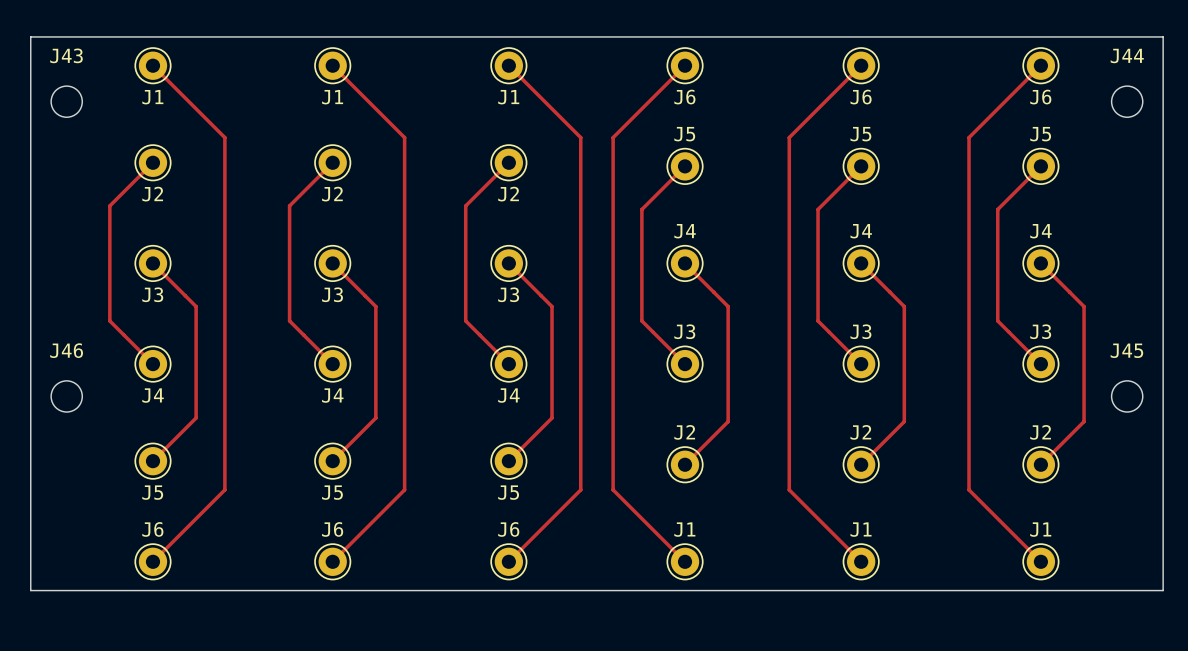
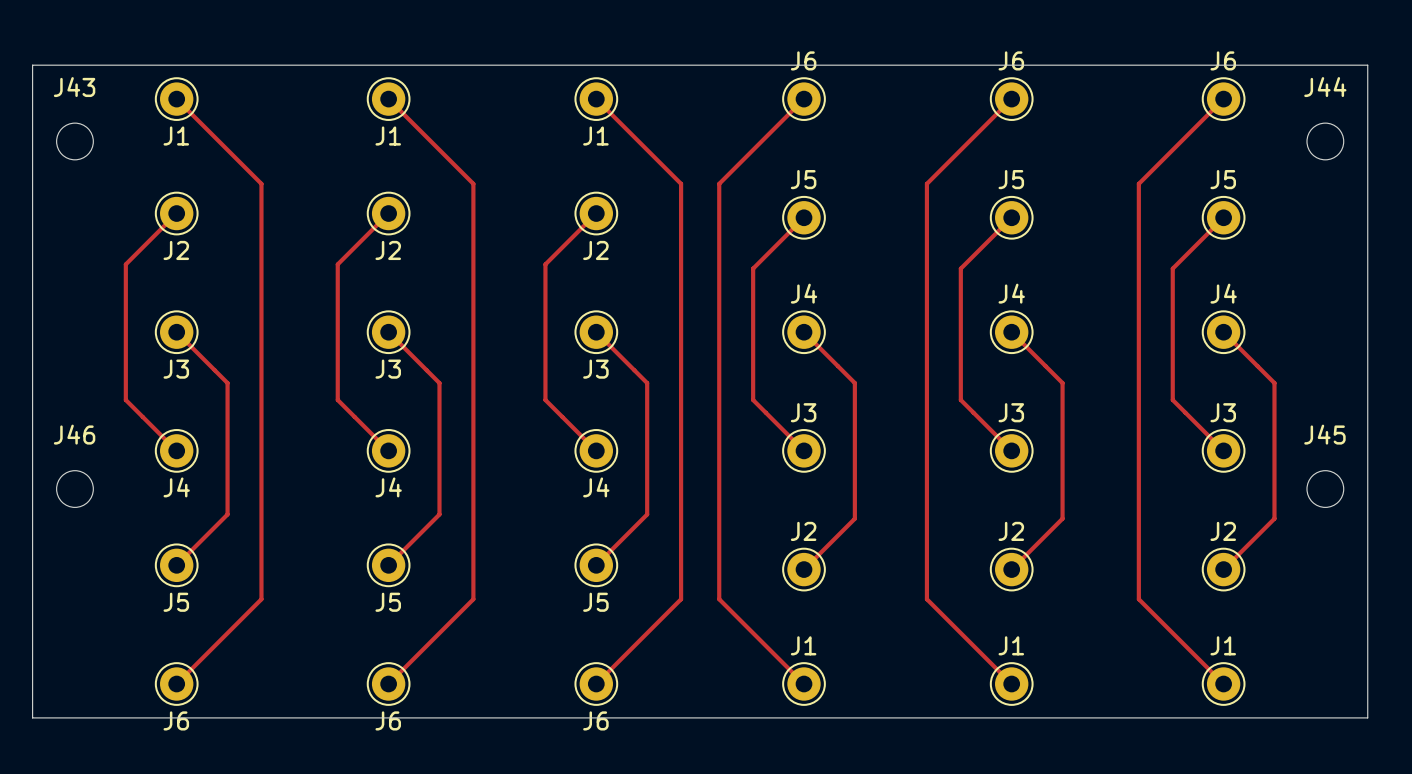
J6 name position: J6 (684, 97) -> J6 (803, 60)
J6 name position: J6 (861, 97) -> J6 (1011, 60)
J6 name position: J6 (1040, 97) -> J6 (1223, 60)
J6 name position: J6 (152, 529) -> J6 (176, 720)
J6 name position: J6 (332, 529) -> J6 (388, 720)
J6 name position: J6 (508, 529) -> J6 (595, 720)

